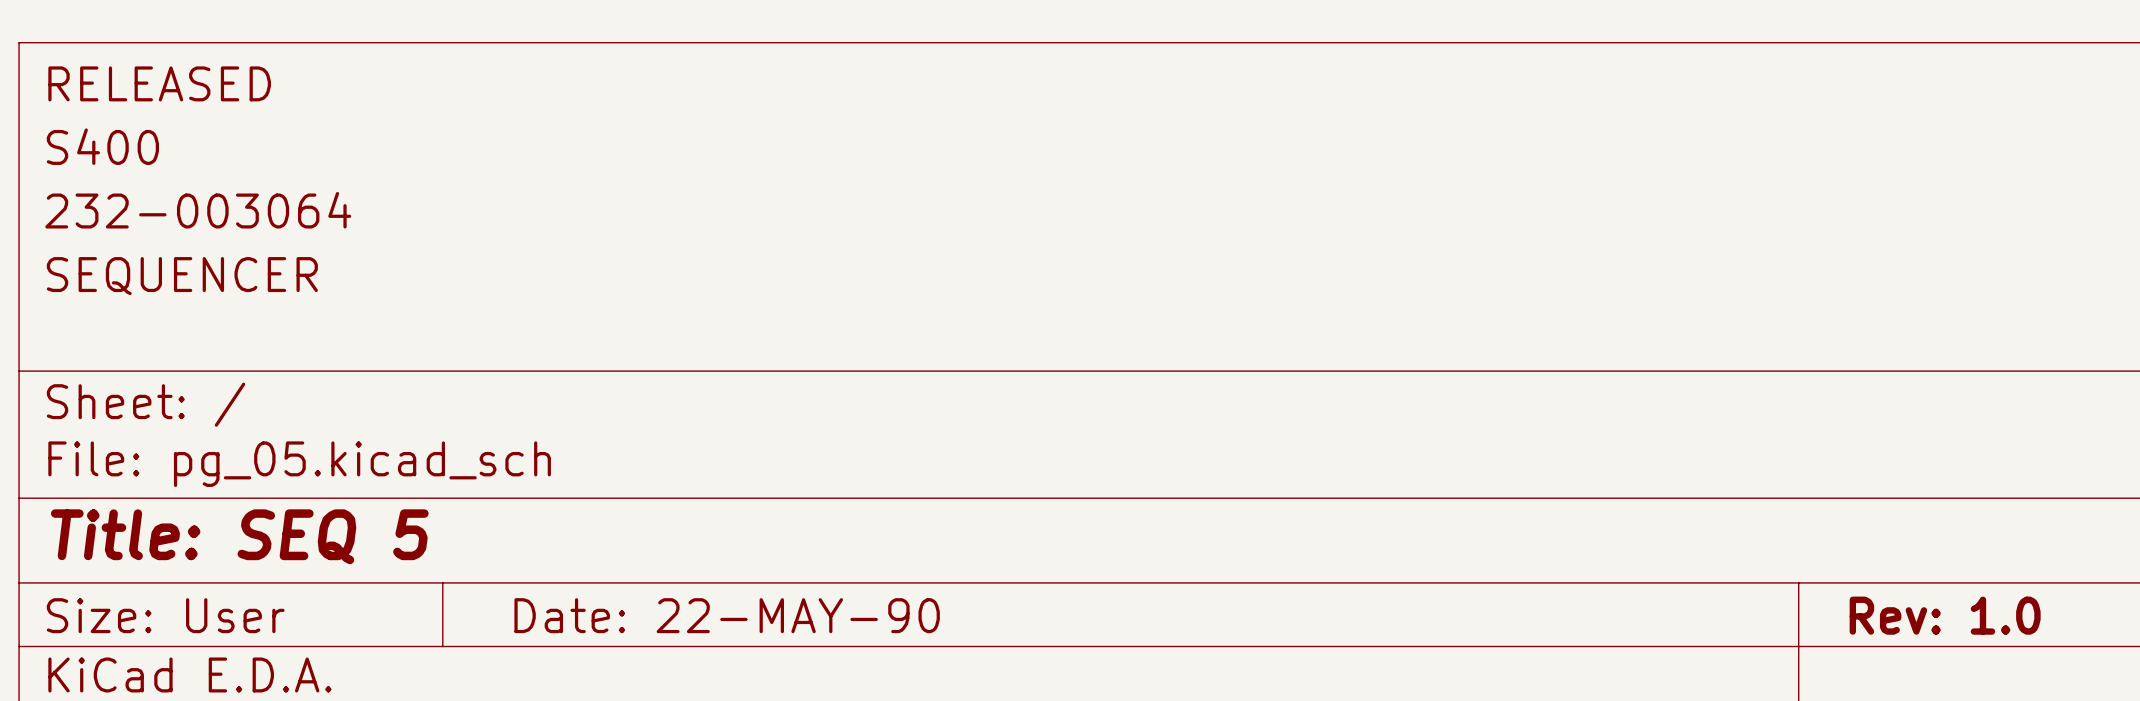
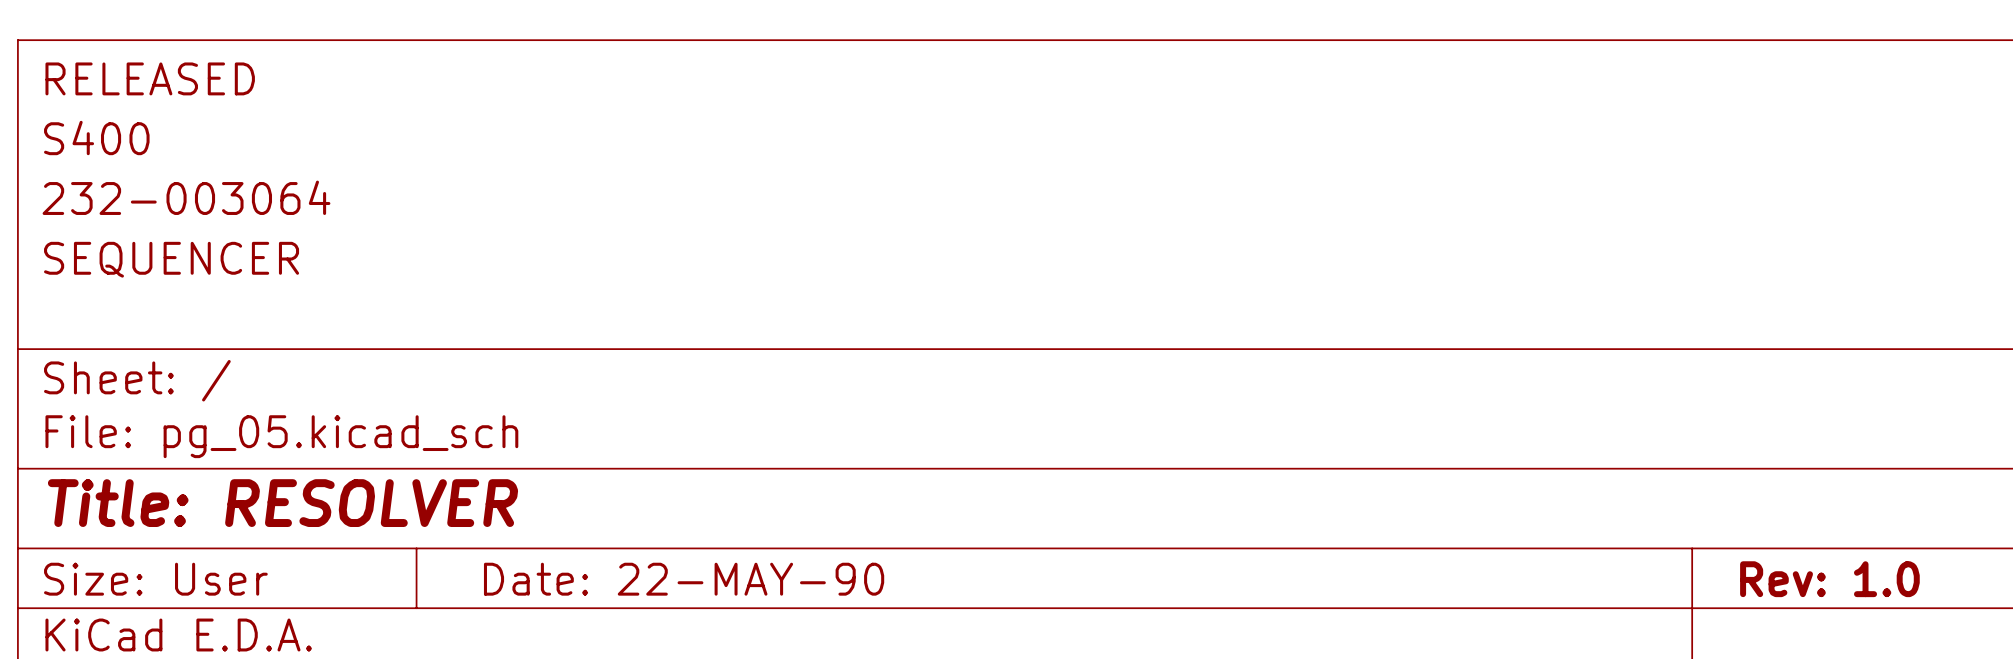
title block: Title: SEQ 5 (239, 536) -> Title: RESOLVER (282, 503)

